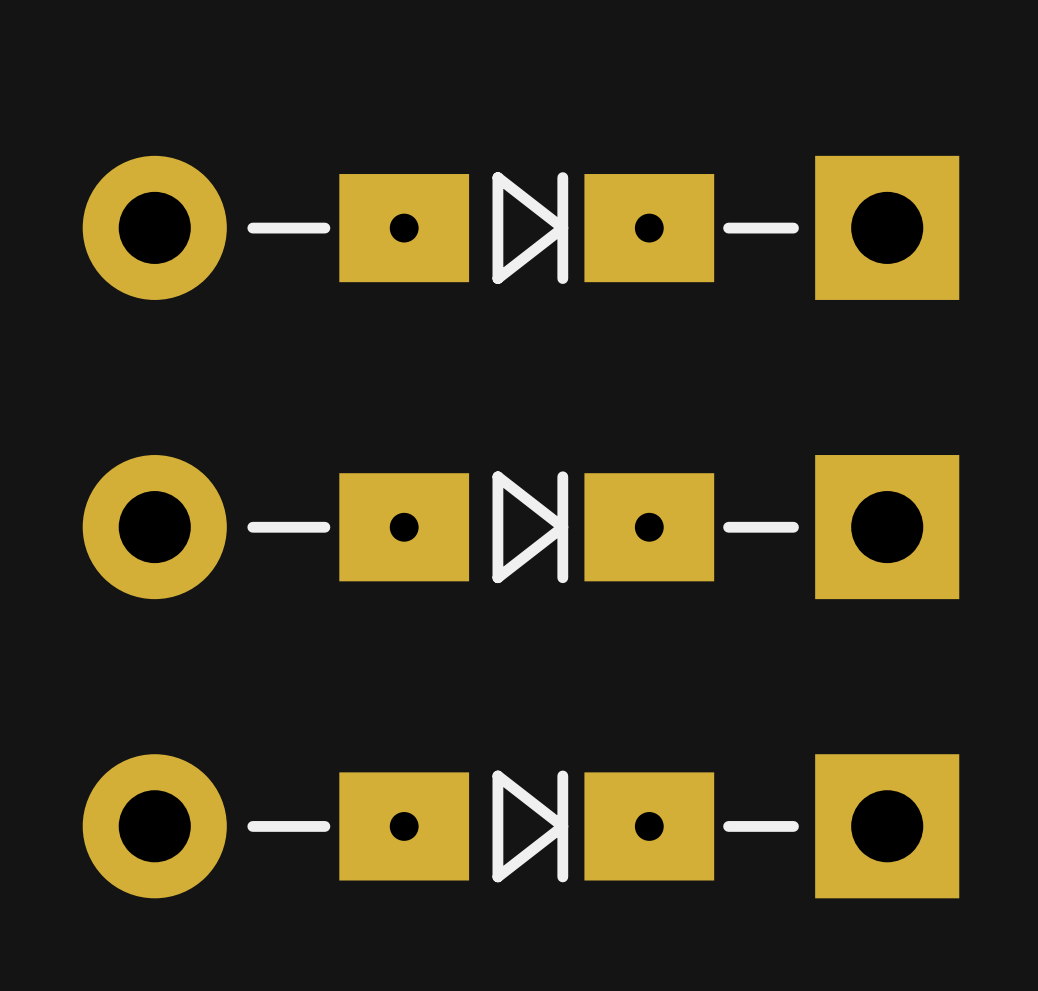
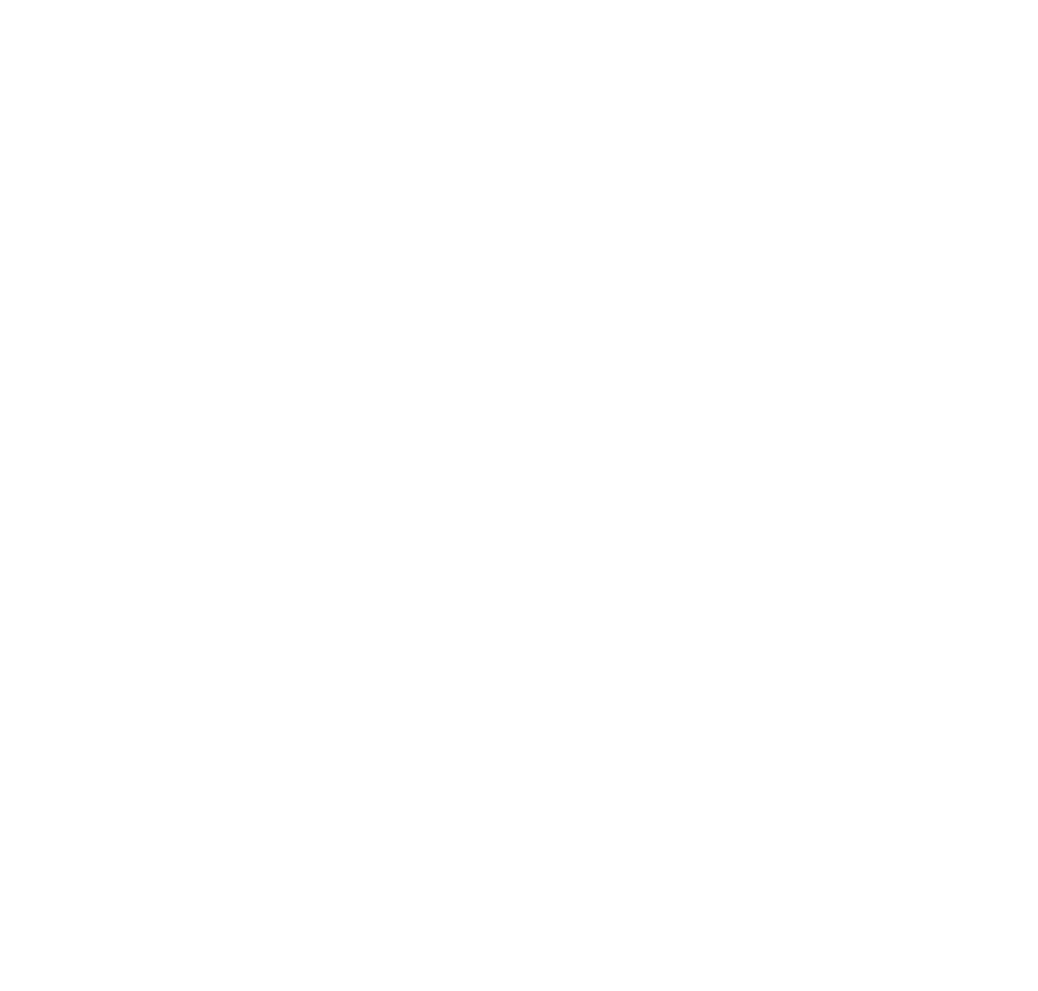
part: (520, 227) -> none
part: (520, 527) -> none
part: (520, 826) -> none

